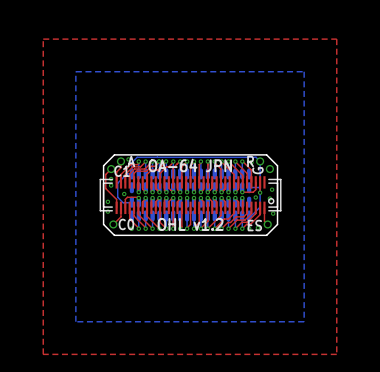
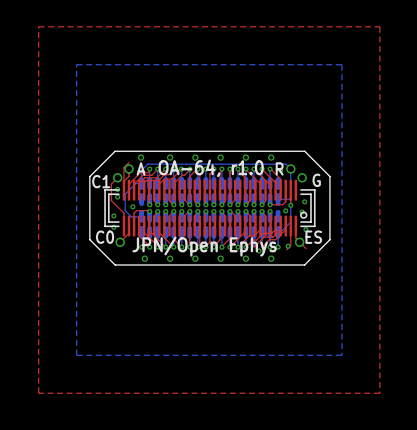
via: none -> (141, 157)
via: none -> (170, 157)
via: none -> (195, 157)
via: none -> (220, 157)
via: none -> (245, 157)
via: none -> (271, 157)
board edge: (114, 154) (266, 154) (277, 165) (277, 224) (266, 235) (114, 235) (103, 224) (103, 165) (114, 154) -> (115, 151) (89, 176) (89, 239) (115, 264) (304, 264) (329, 239) (329, 176) (304, 151) (115, 151)
top track: none -> (129, 162) (123, 167) (123, 181)
via: (128, 159) -> none
text: OA-64 JPN (190, 165) -> OA-64, r1.0 (211, 168)
text rotation: 0° (257, 170) -> 90° clockwise (316, 180)
text position: G (257, 170) -> G (316, 180)
text position: C1 (122, 171) -> C1 (101, 181)
part footprint: [99, 176, 282, 215] -> [104, 179, 316, 237]
top track: (260, 214) (250, 224) (246, 224) (242, 228) -> (290, 230) (290, 245) (286, 249)
text position: C0 (126, 224) -> C0 (105, 237)
text: OHL v1.2 (190, 224) -> JPN/Open Ephys (204, 246)
top track: none -> (299, 242) (305, 248)
text position: ES (254, 225) -> ES (313, 237)
via: (228, 228) -> none
via: (235, 228) -> none
via: none -> (259, 250)
via: none -> (144, 258)
via: none -> (170, 258)
via: none -> (195, 258)
via: none -> (220, 258)
via: none -> (245, 258)
via: none -> (271, 258)

